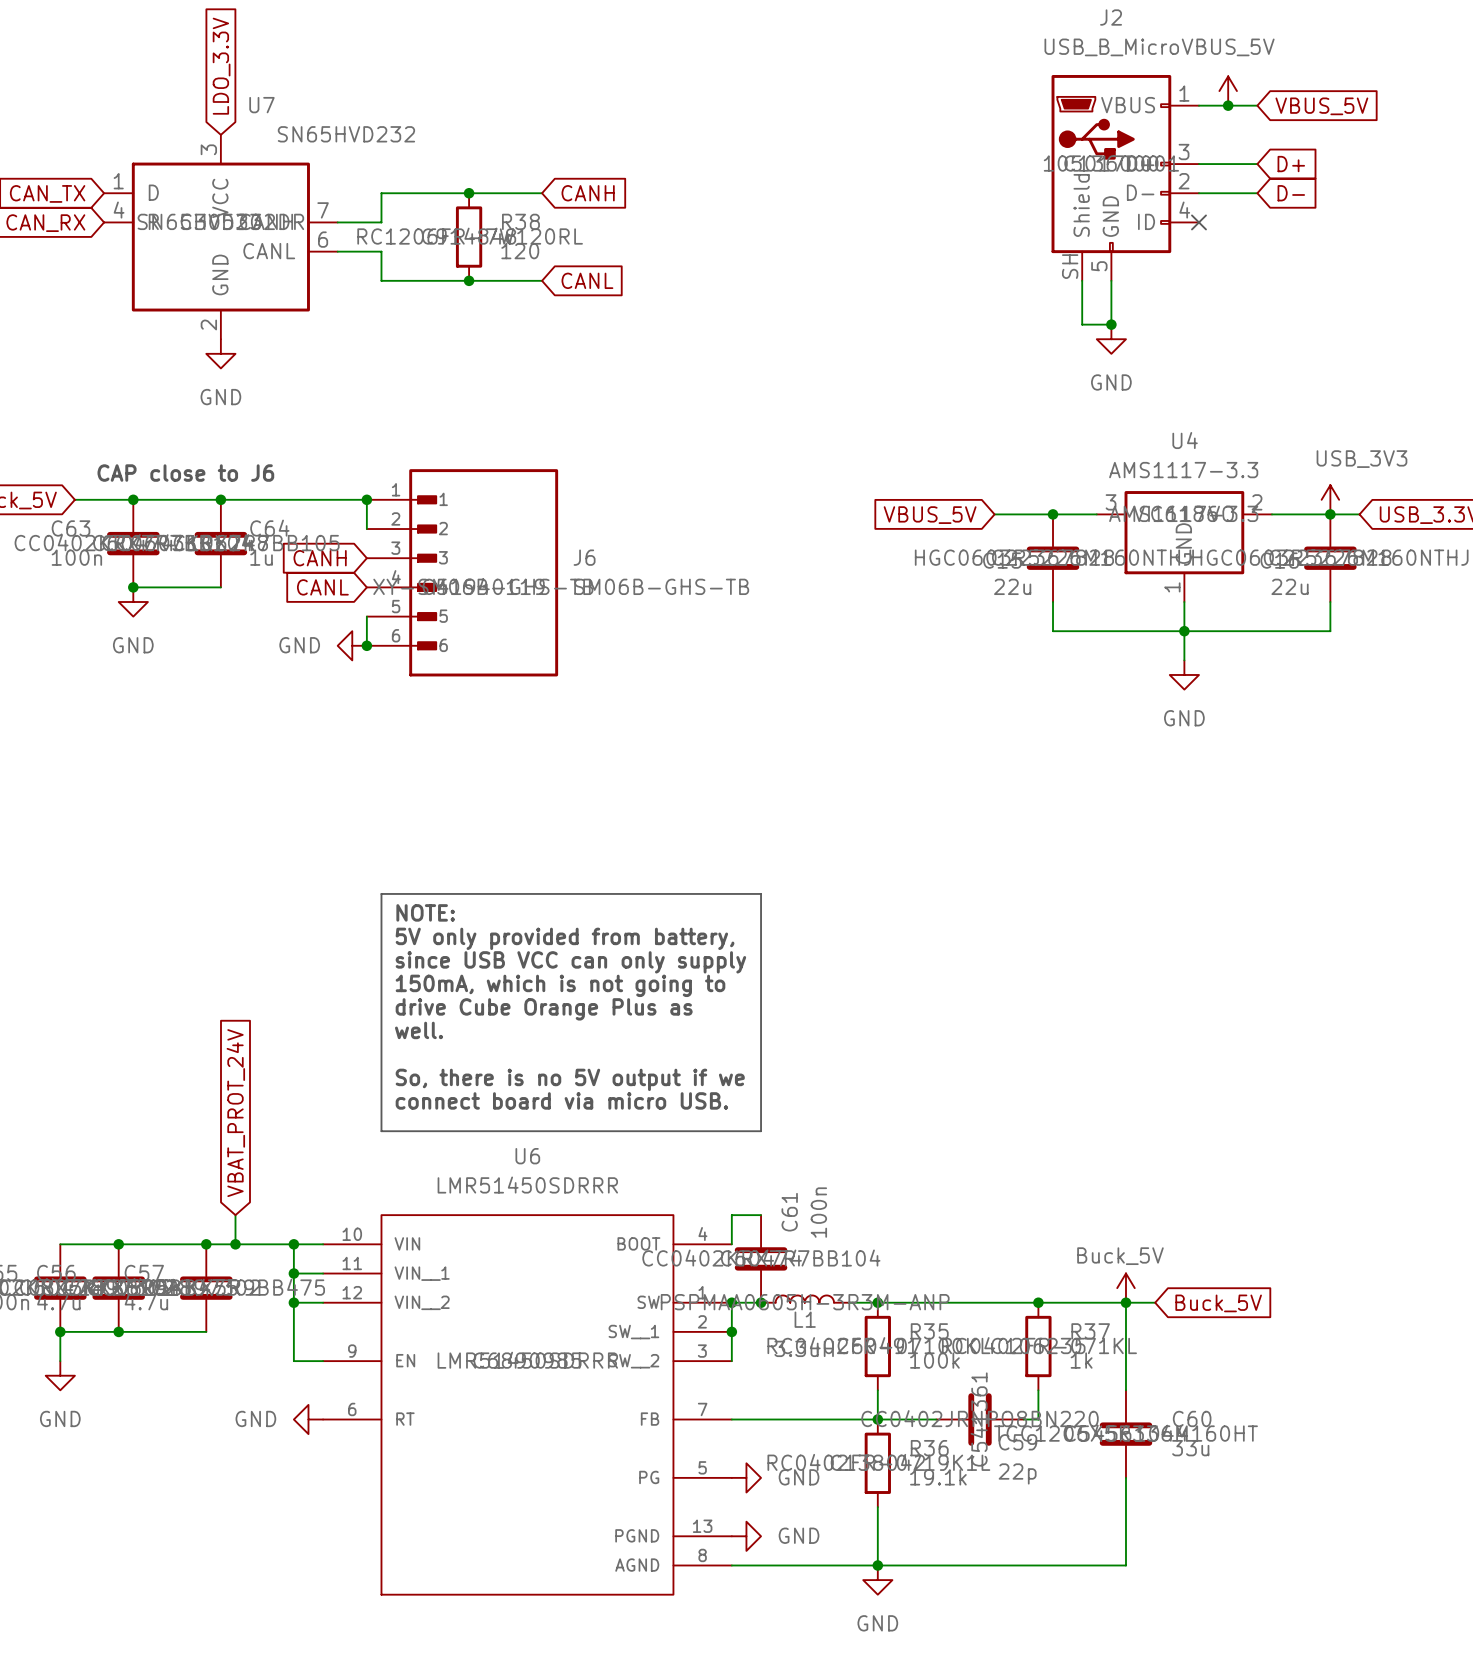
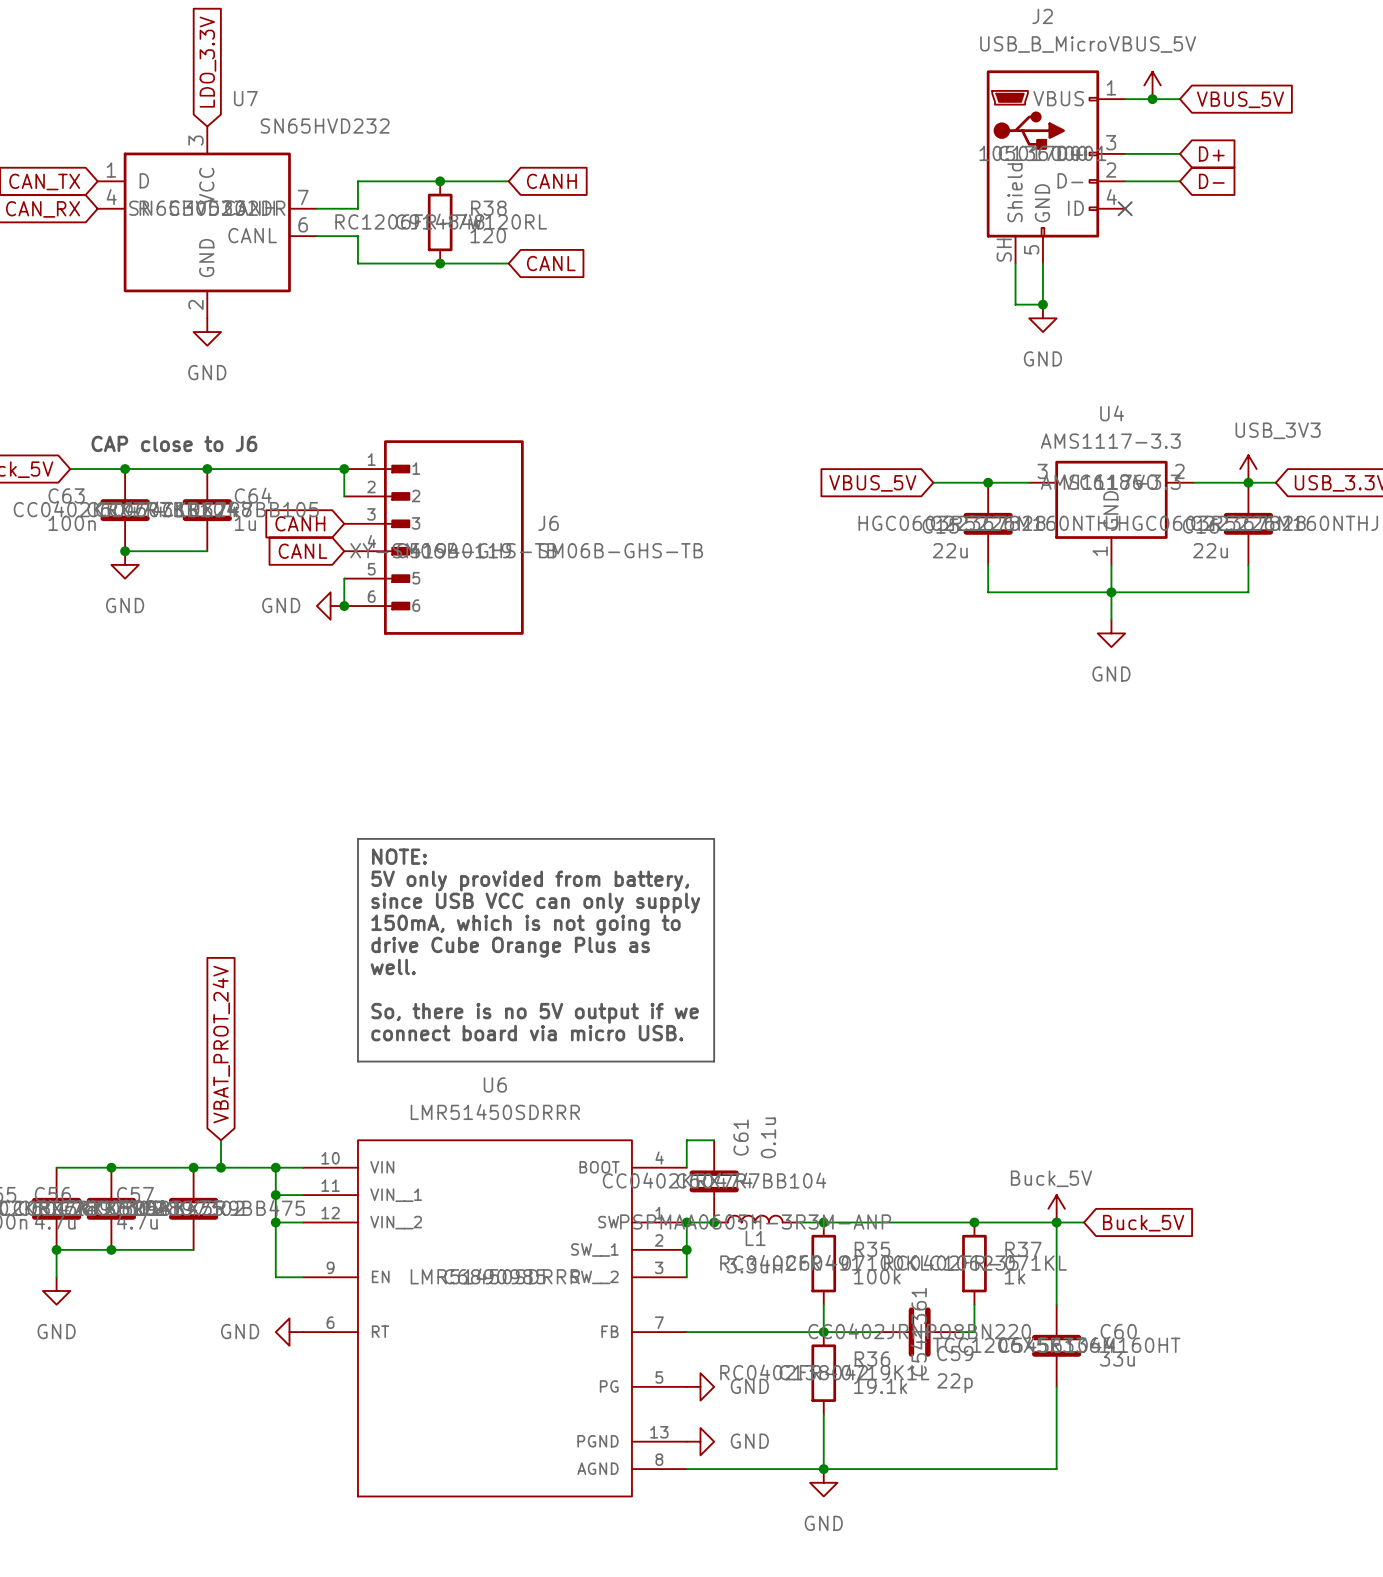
C61 value: 100n (818, 1212) -> 0.1u (768, 1137)

